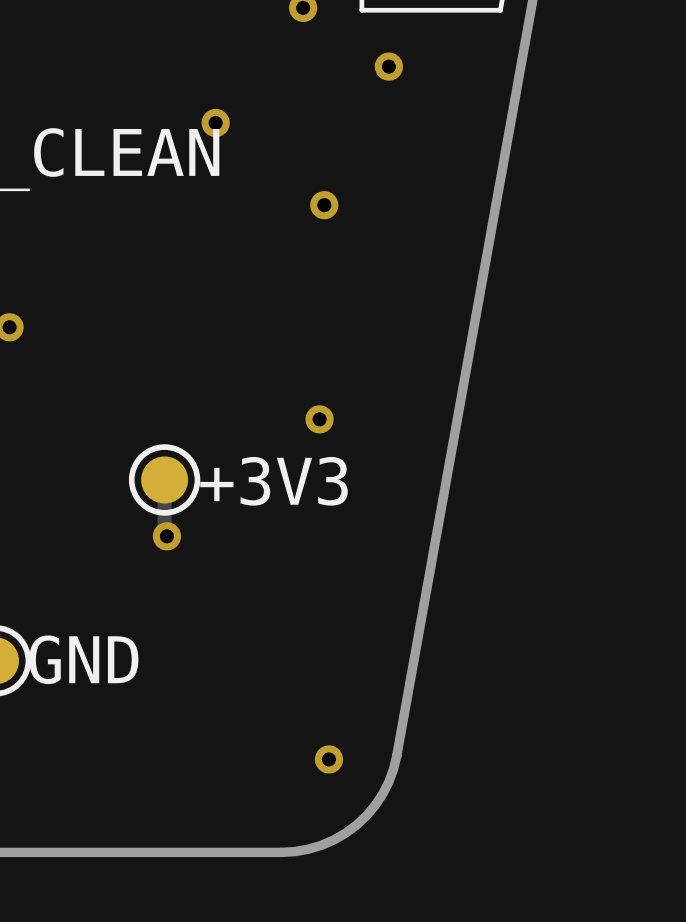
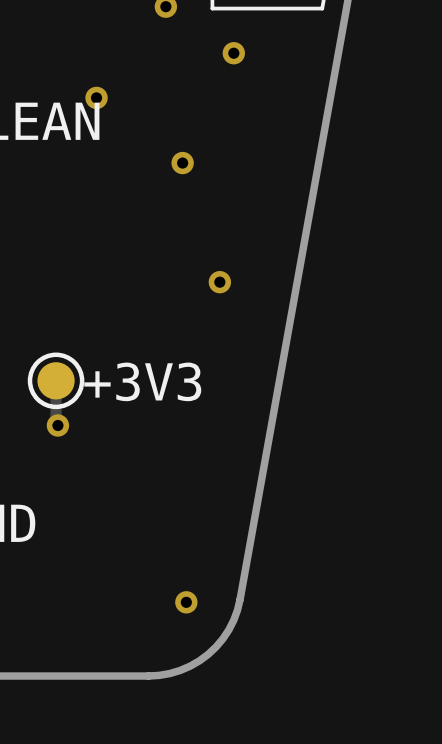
via position: (319, 419) -> (219, 282)

